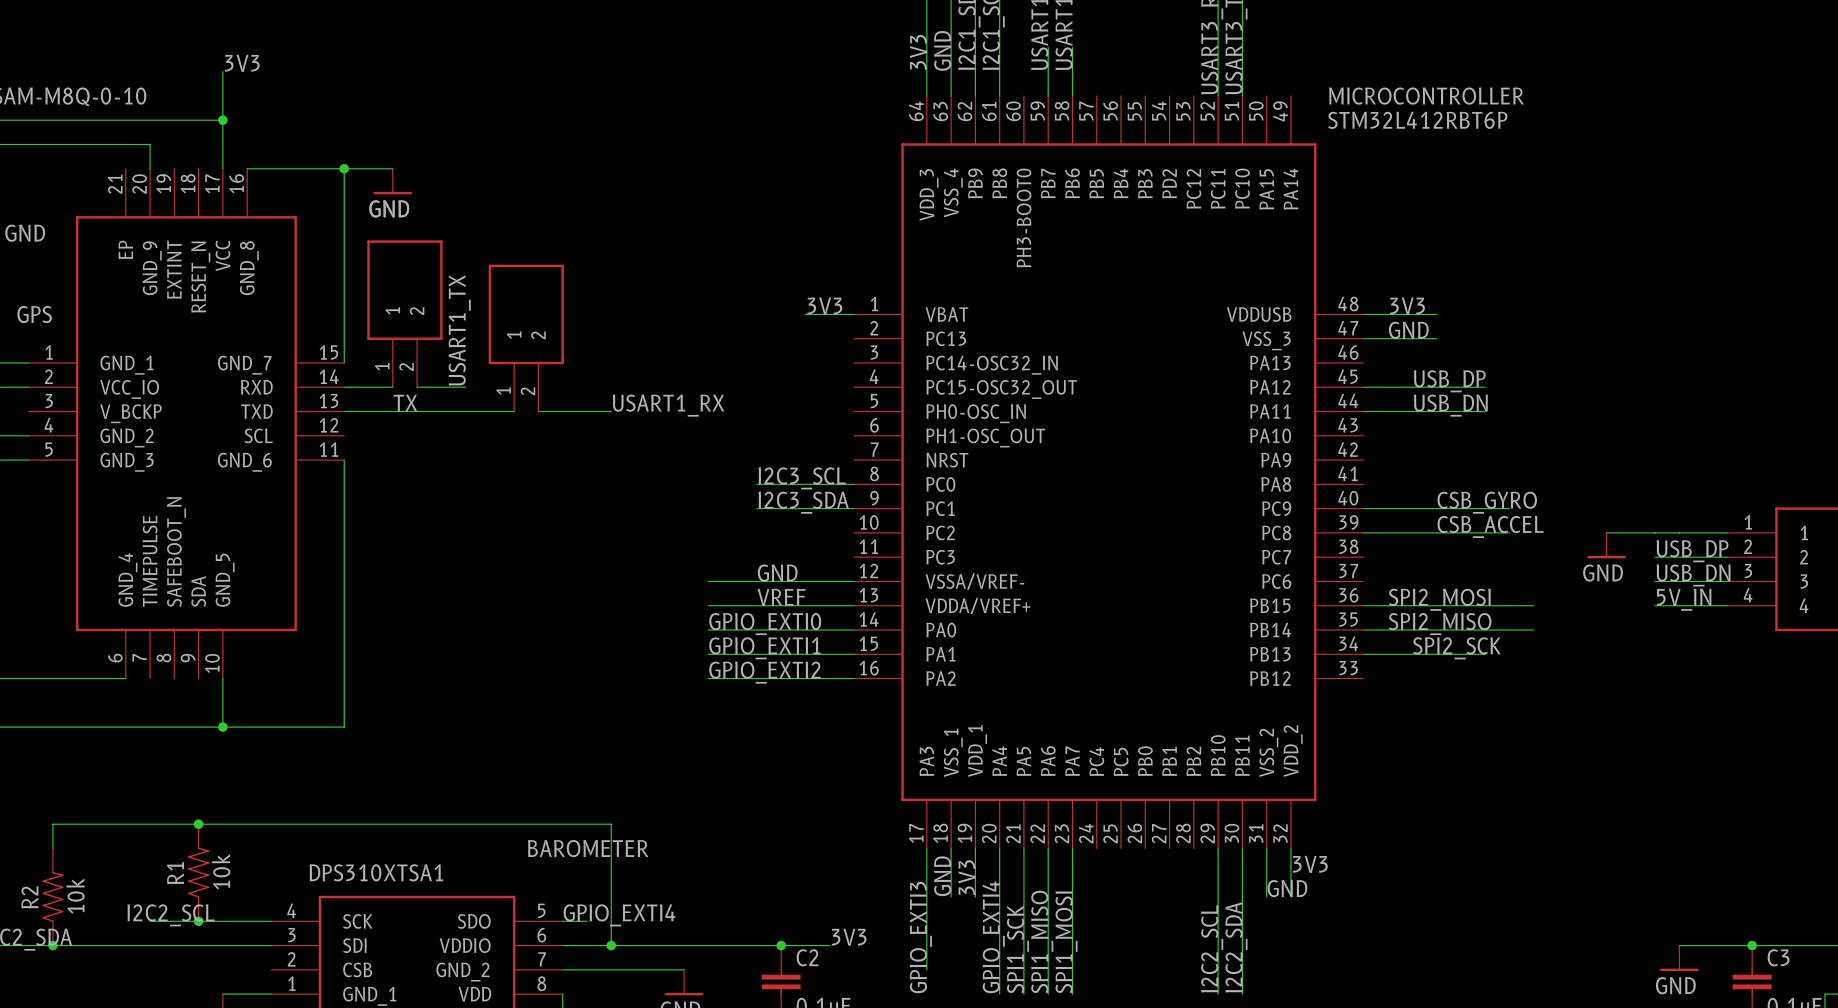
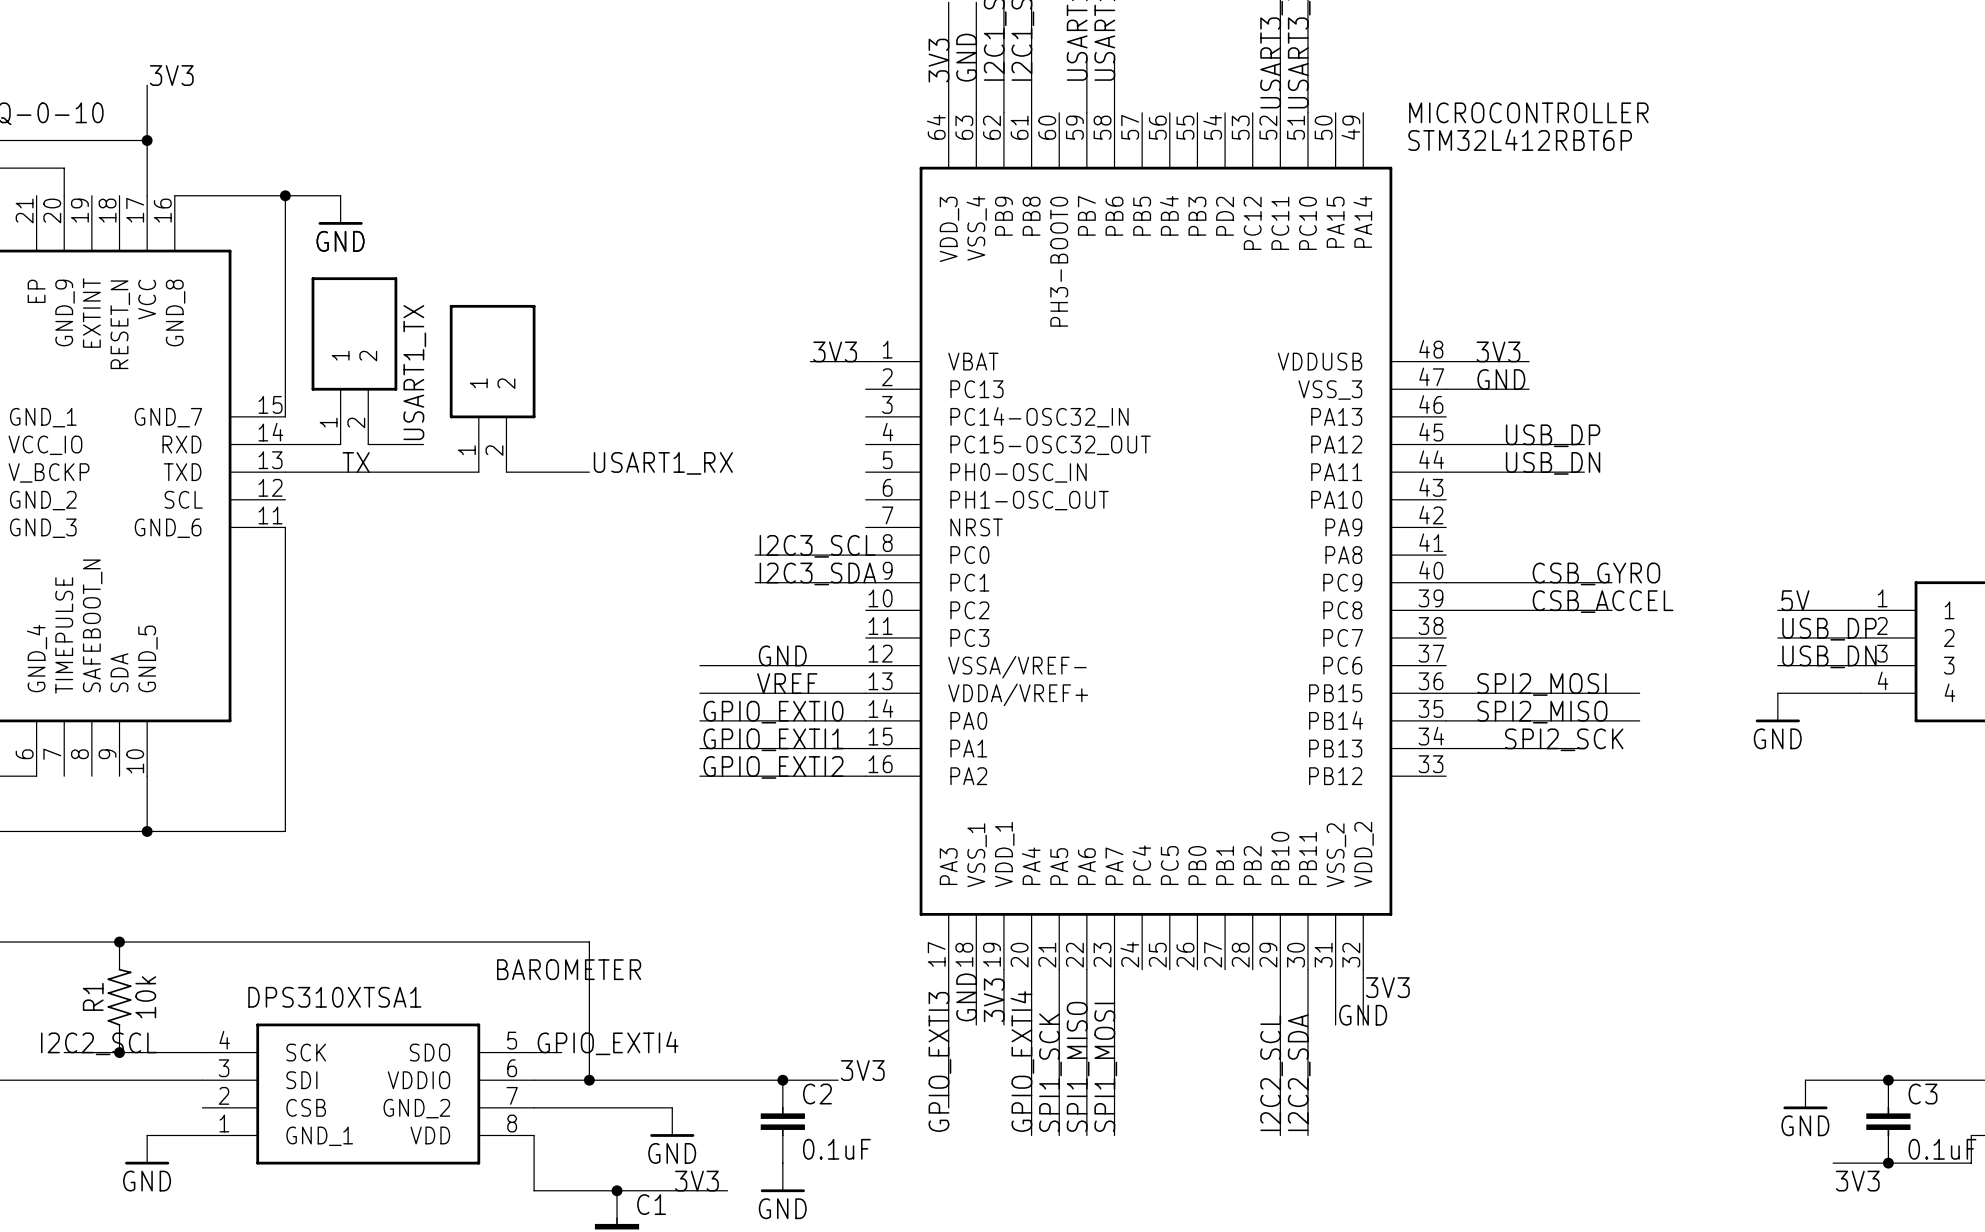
label: none -> 5V (1795, 600)
wire: (1606, 532) (1655, 532) -> none
power symbol position: GND (1606, 545) -> GND (1777, 707)
label: 5V_IN (1684, 599) -> none

